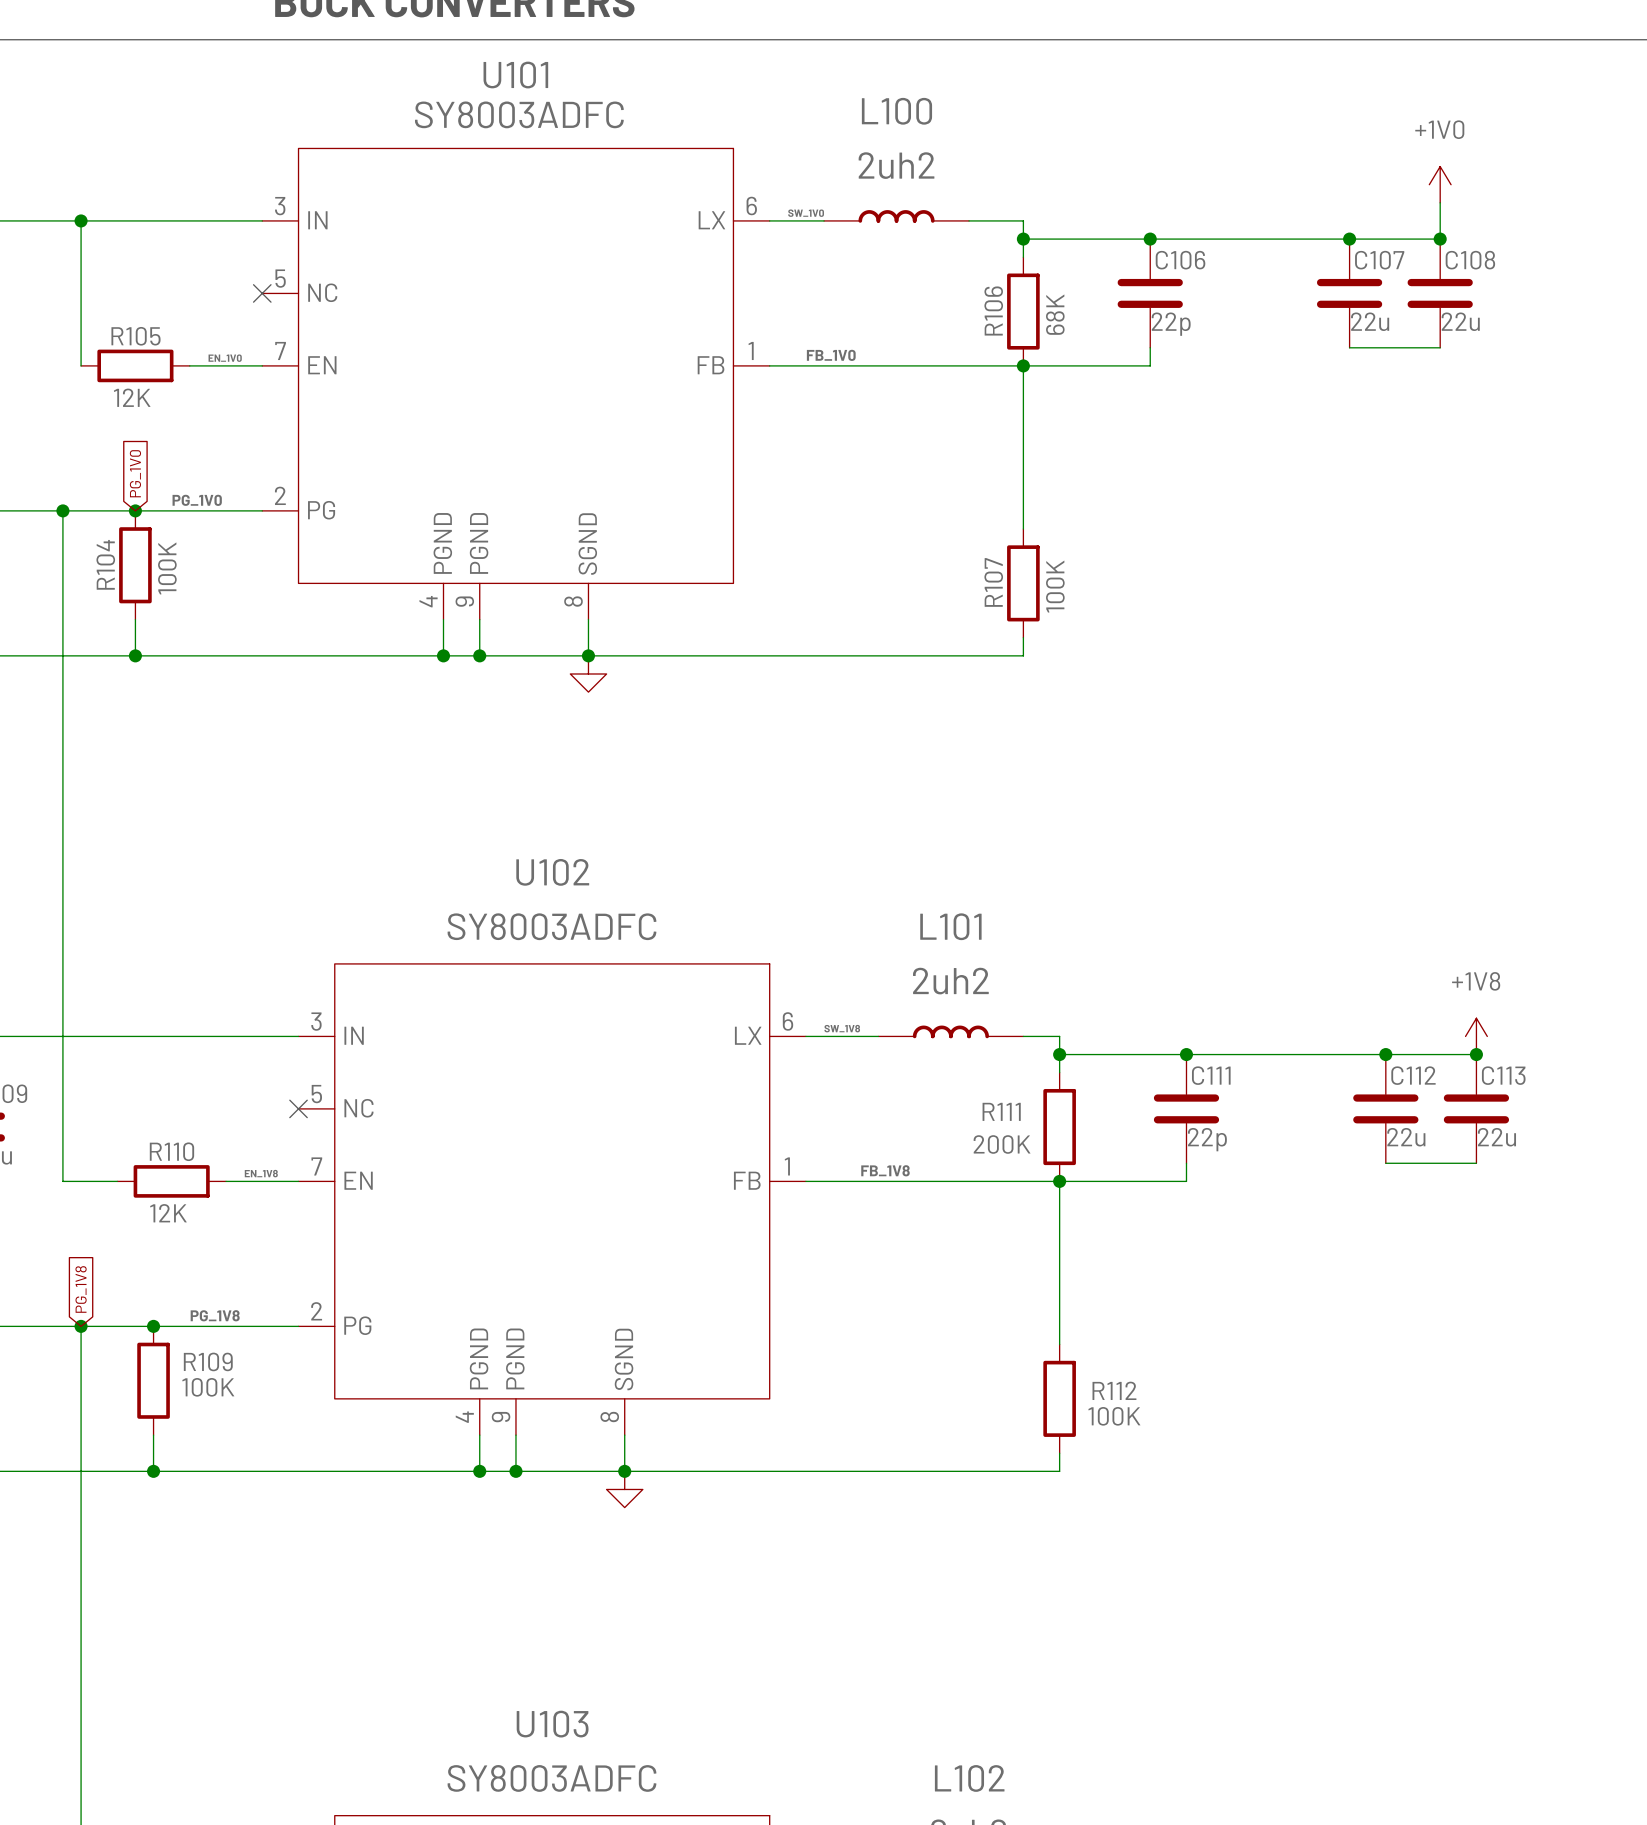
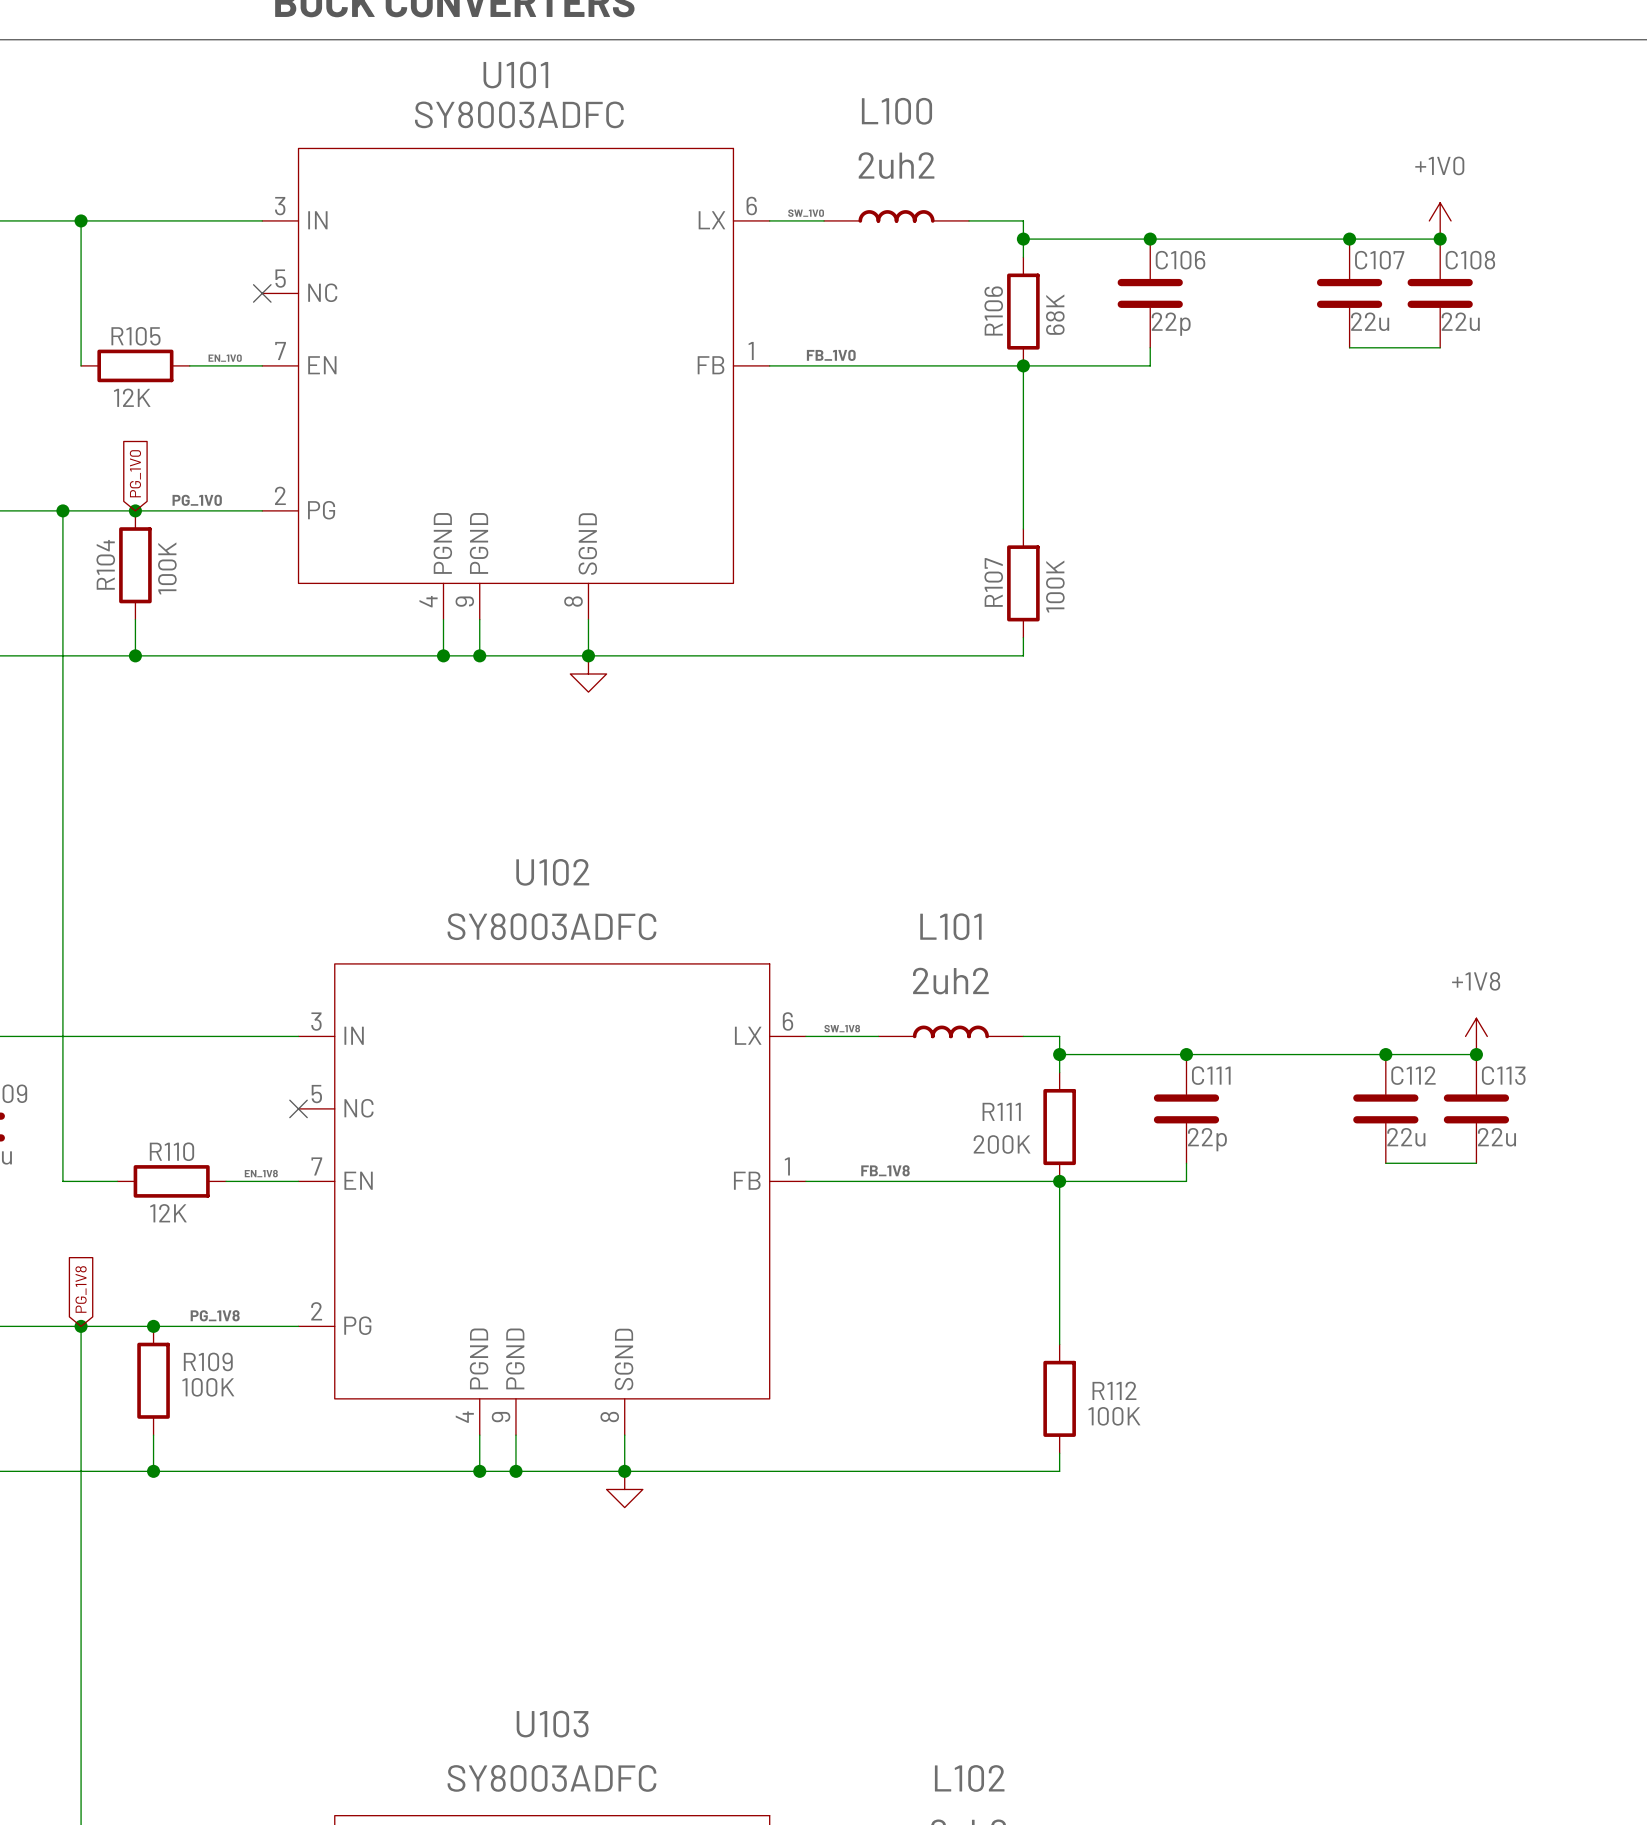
power symbol position: +1V0 (1440, 184) -> +1V0 (1440, 220)

